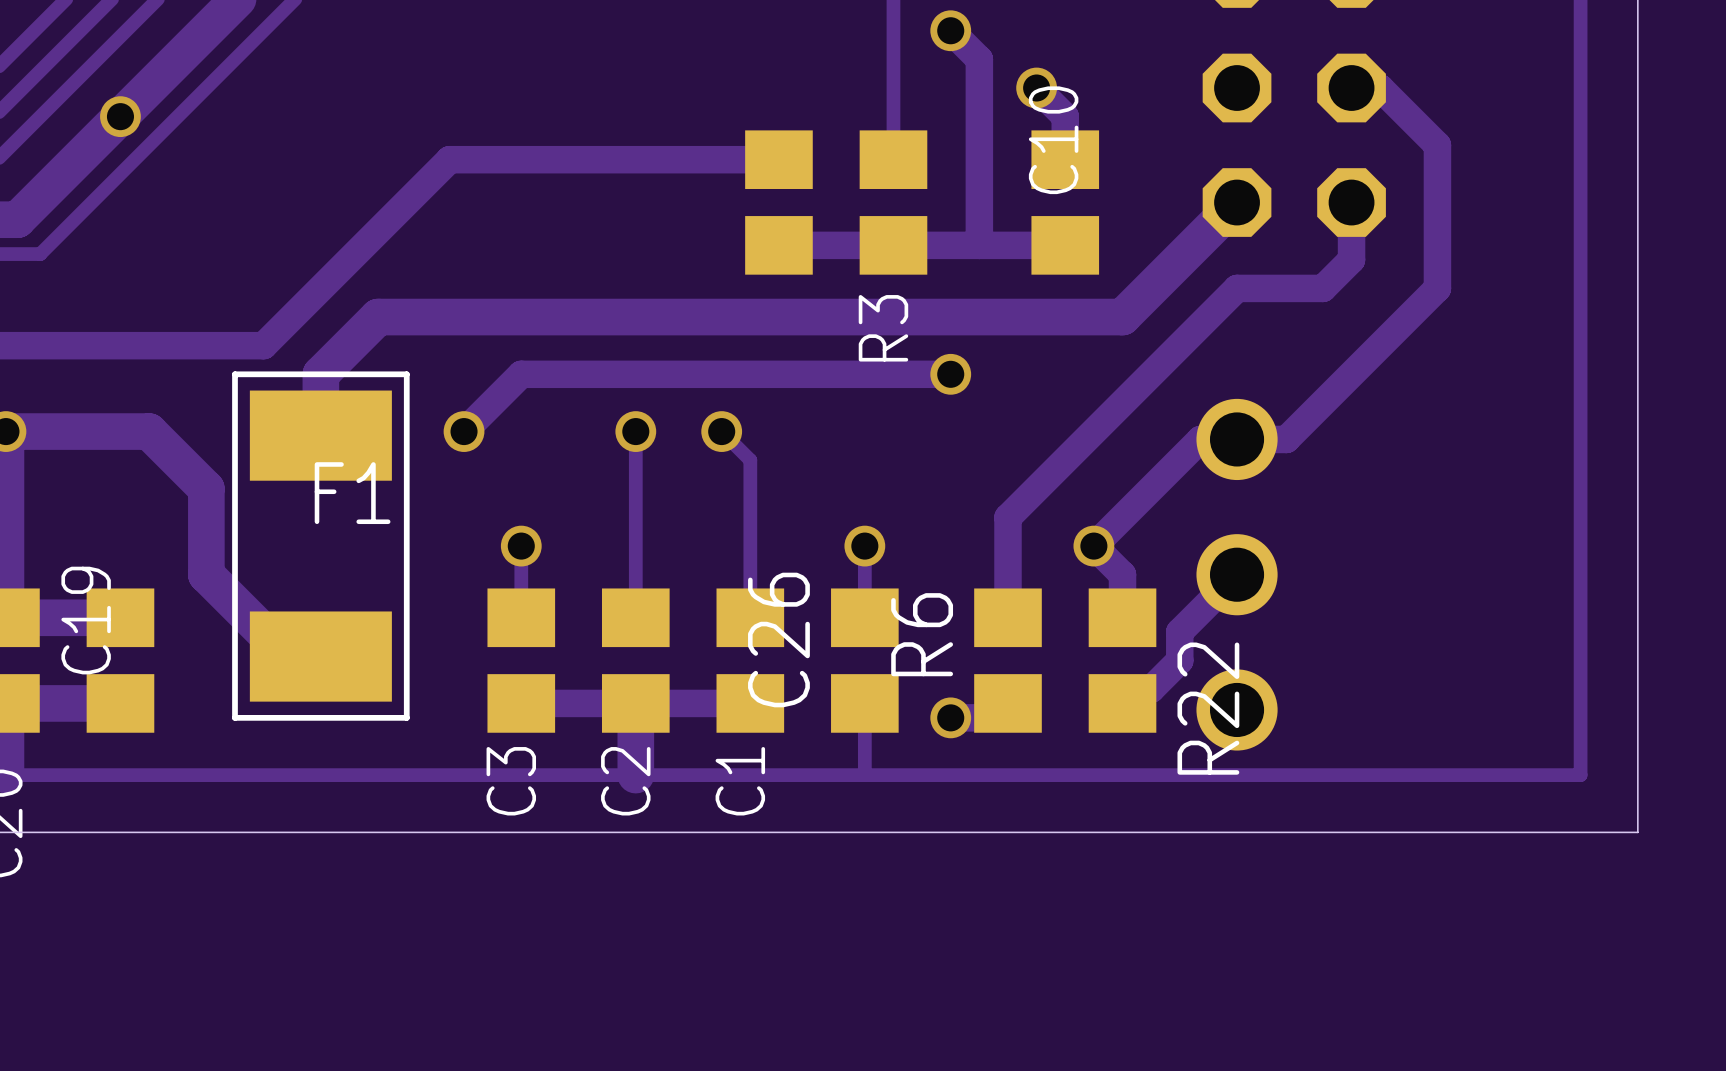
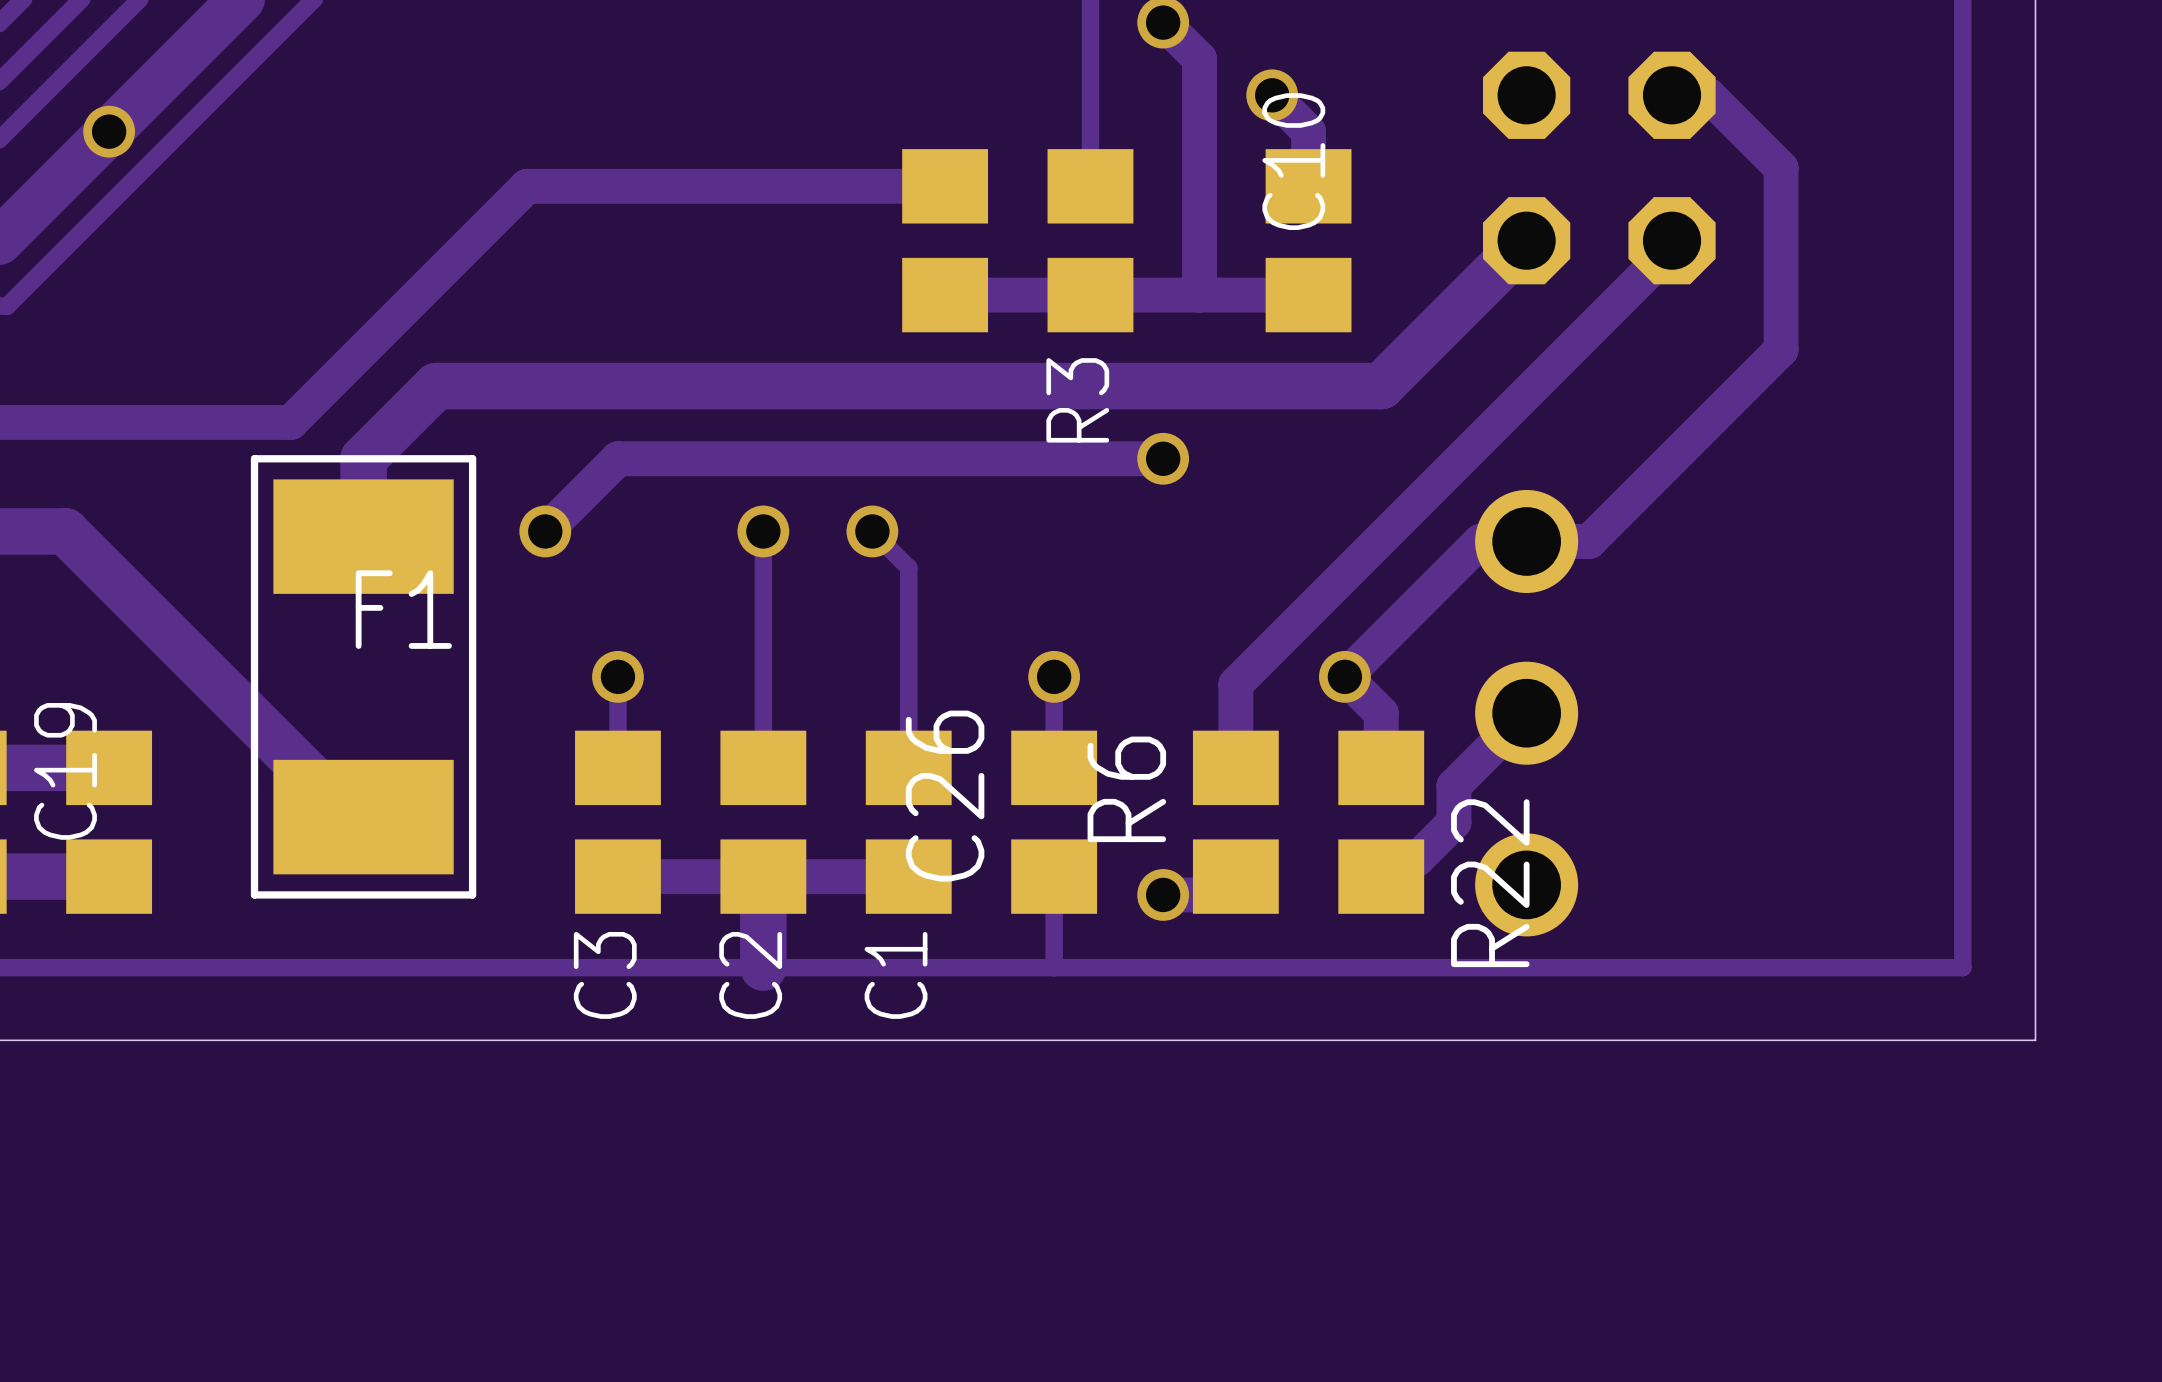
track: (1351, 208) (1351, 259) (1322, 288) (1237, 288) (1007, 517) (1007, 551) -> (1672, 247) (1235, 684)
track: (86, 431) (149, 431) (206, 488) (206, 574) (292, 660) (315, 660) -> (65, 531) (356, 822)

